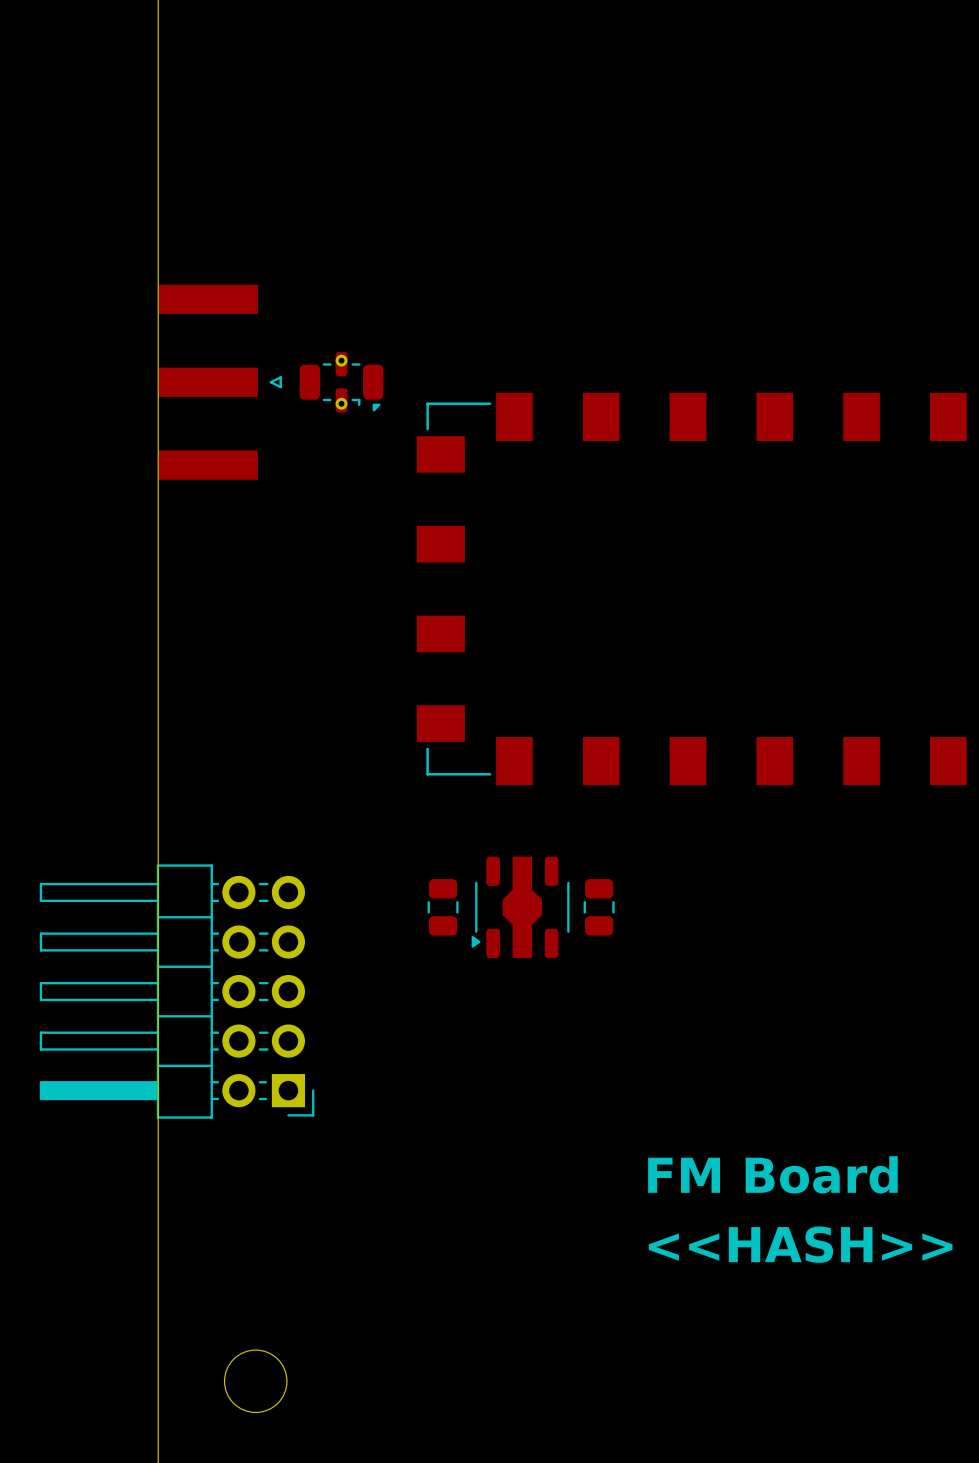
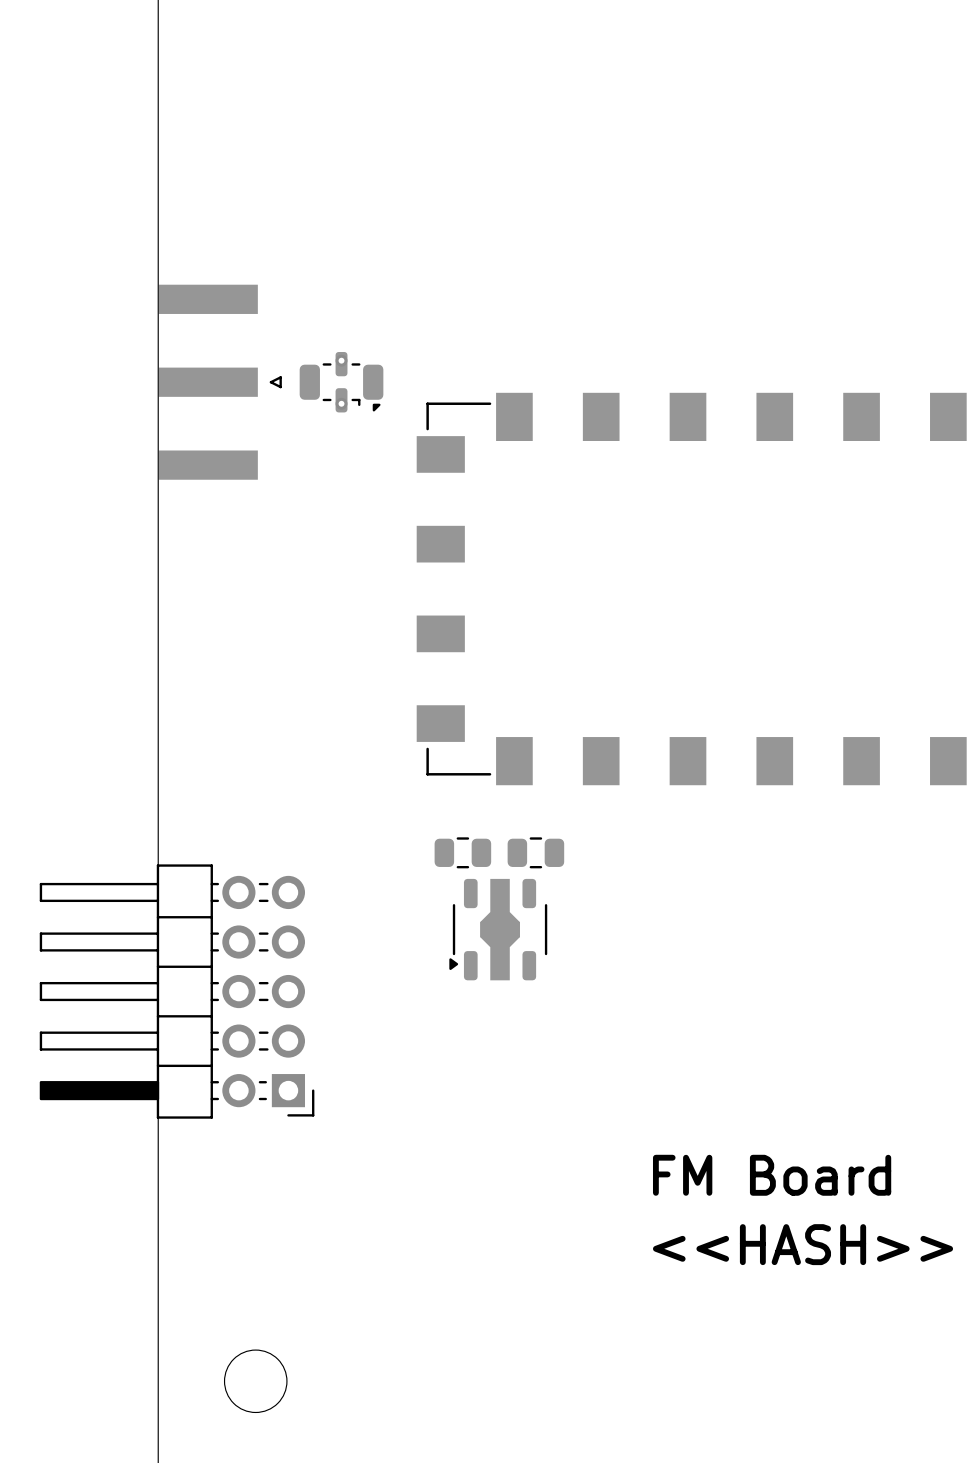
part: none -> (462, 852)
part: none -> (535, 852)
part: (443, 907) -> none
part position: (520, 907) -> (498, 929)
part: (599, 907) -> none

